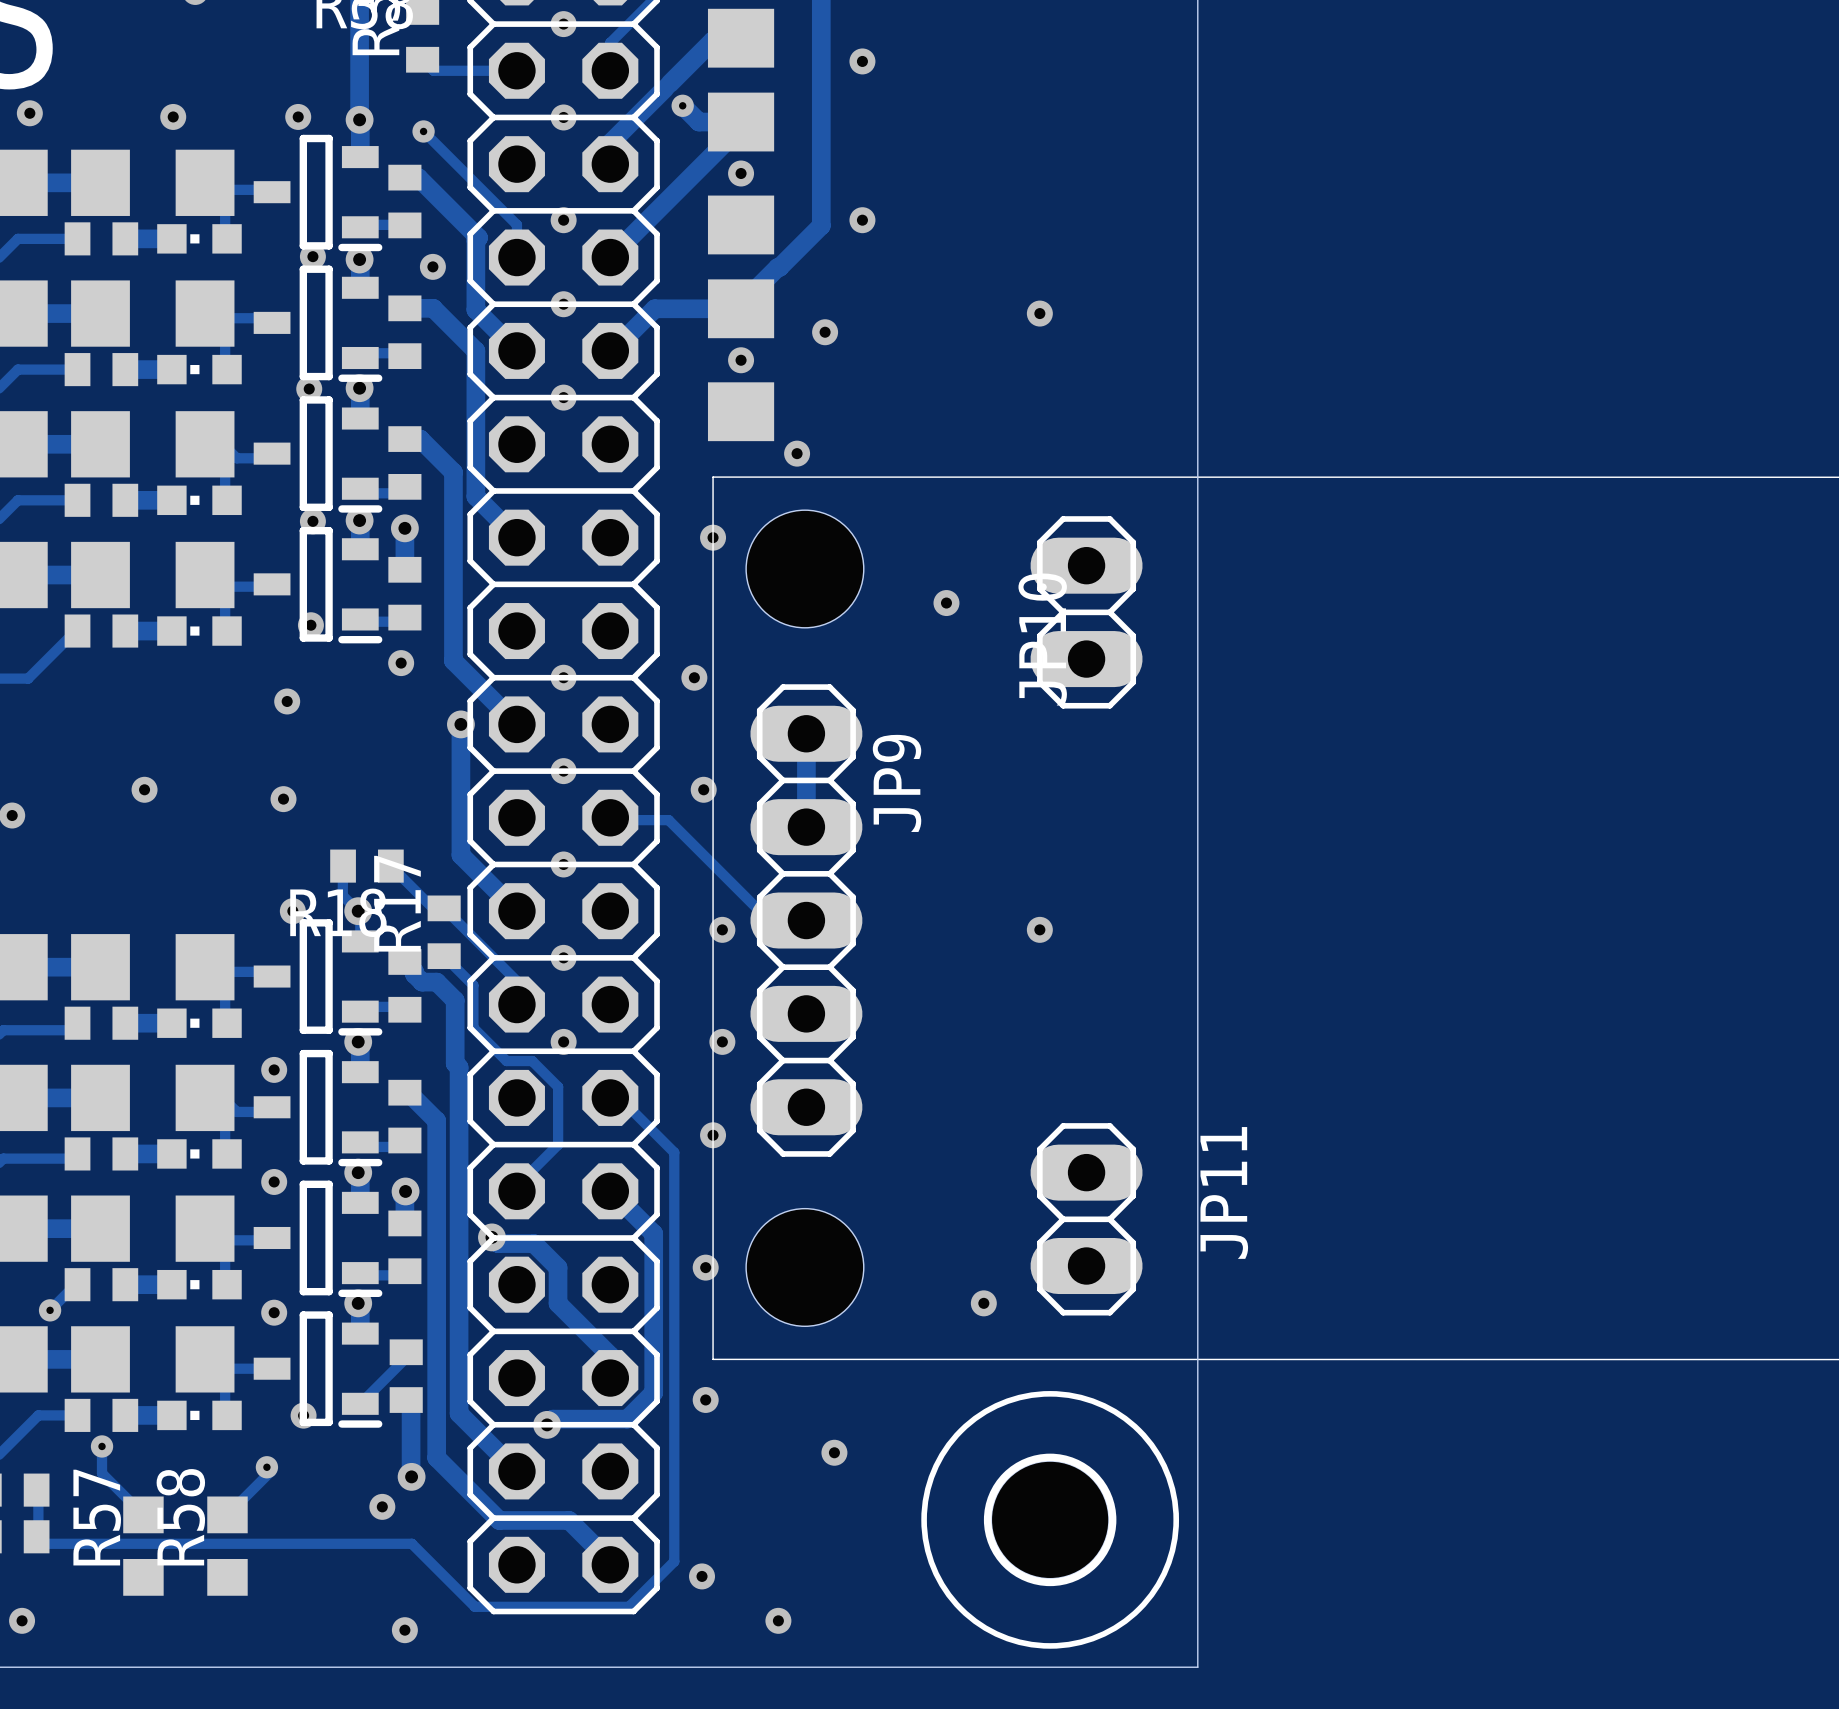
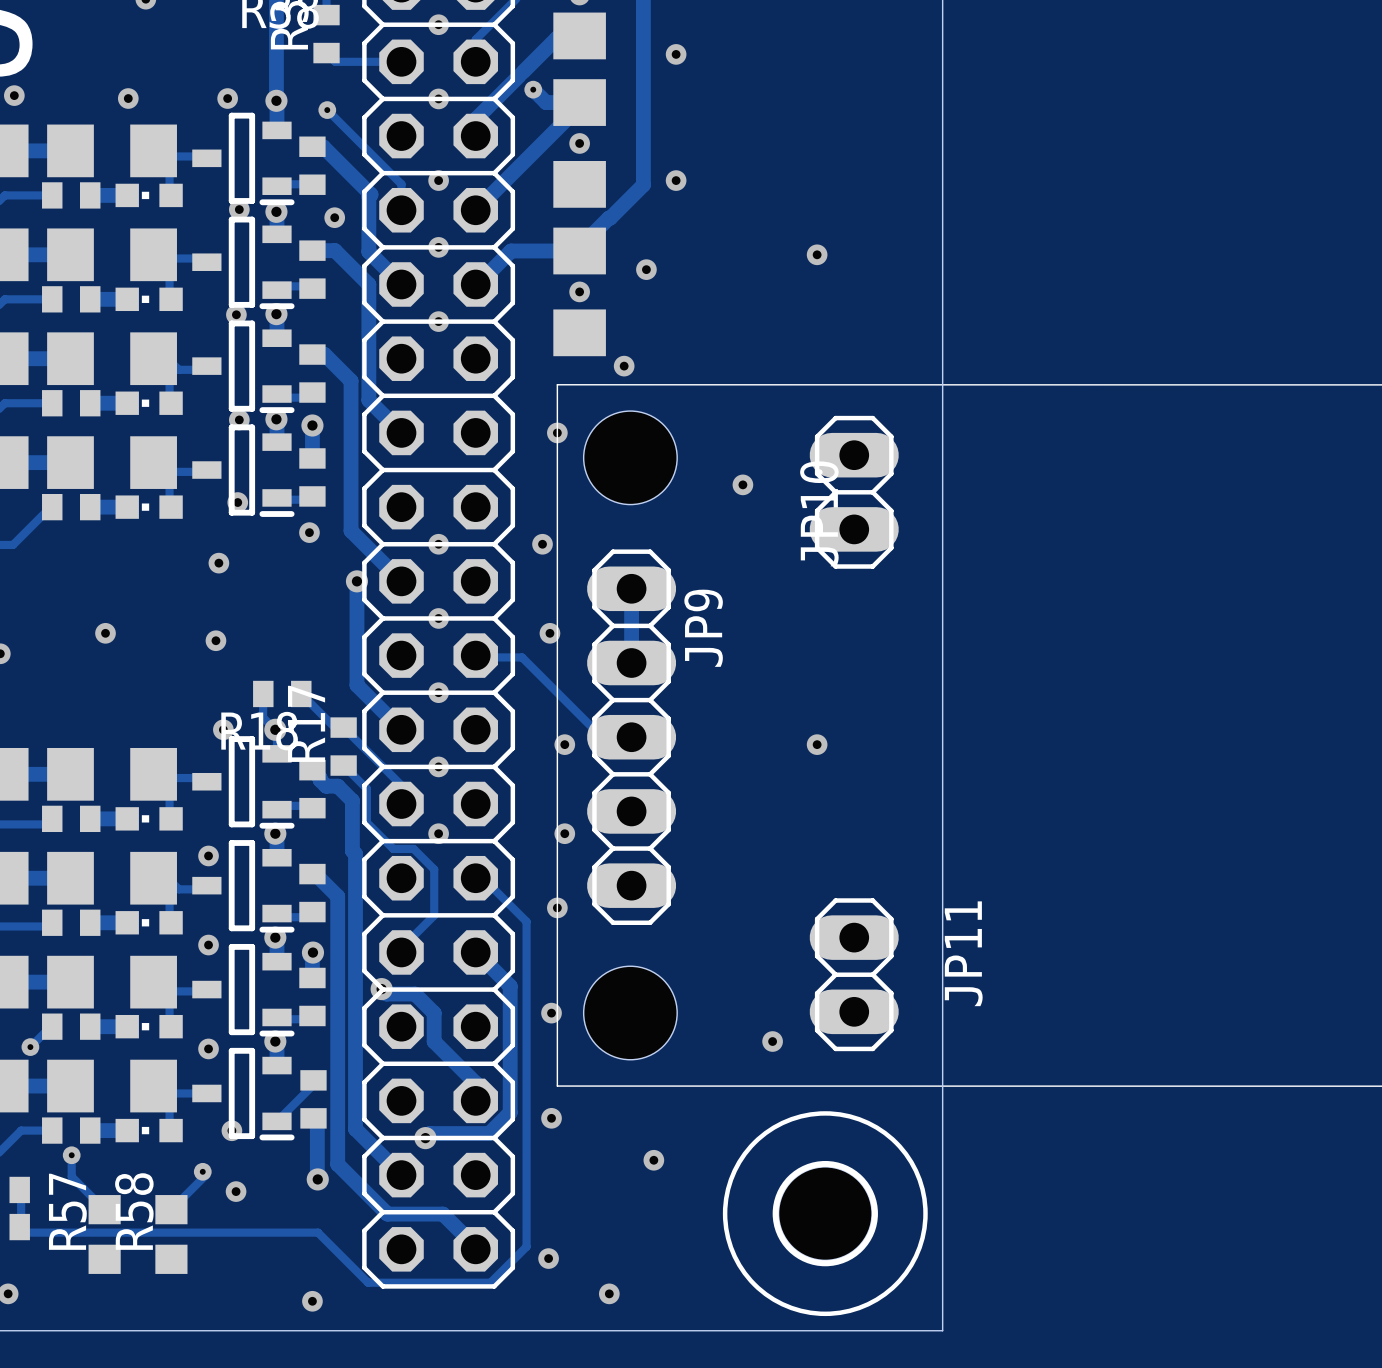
via position: (382, 1506) -> (236, 1191)

